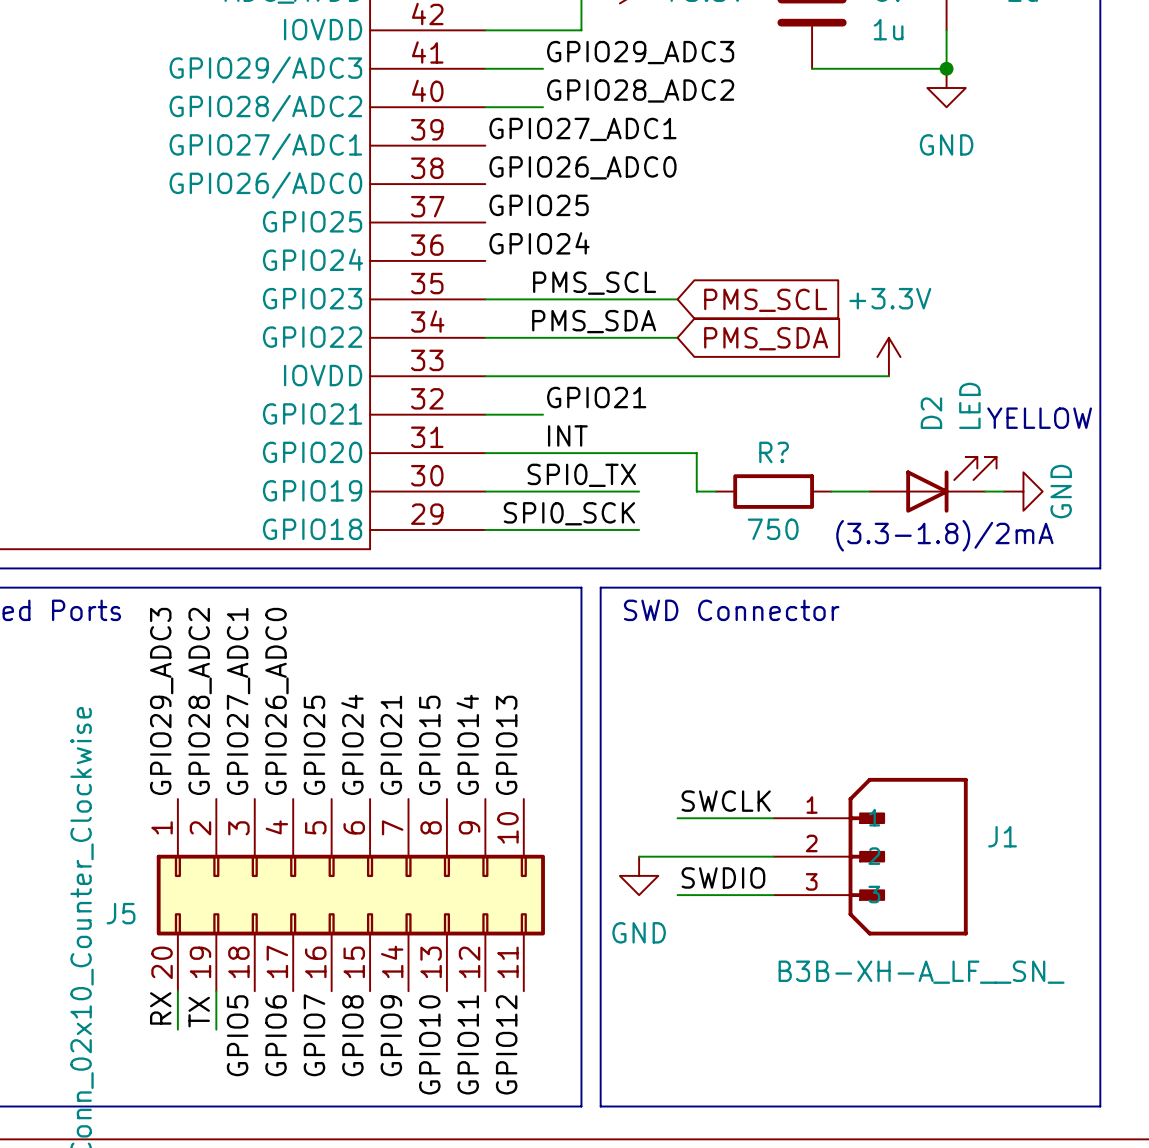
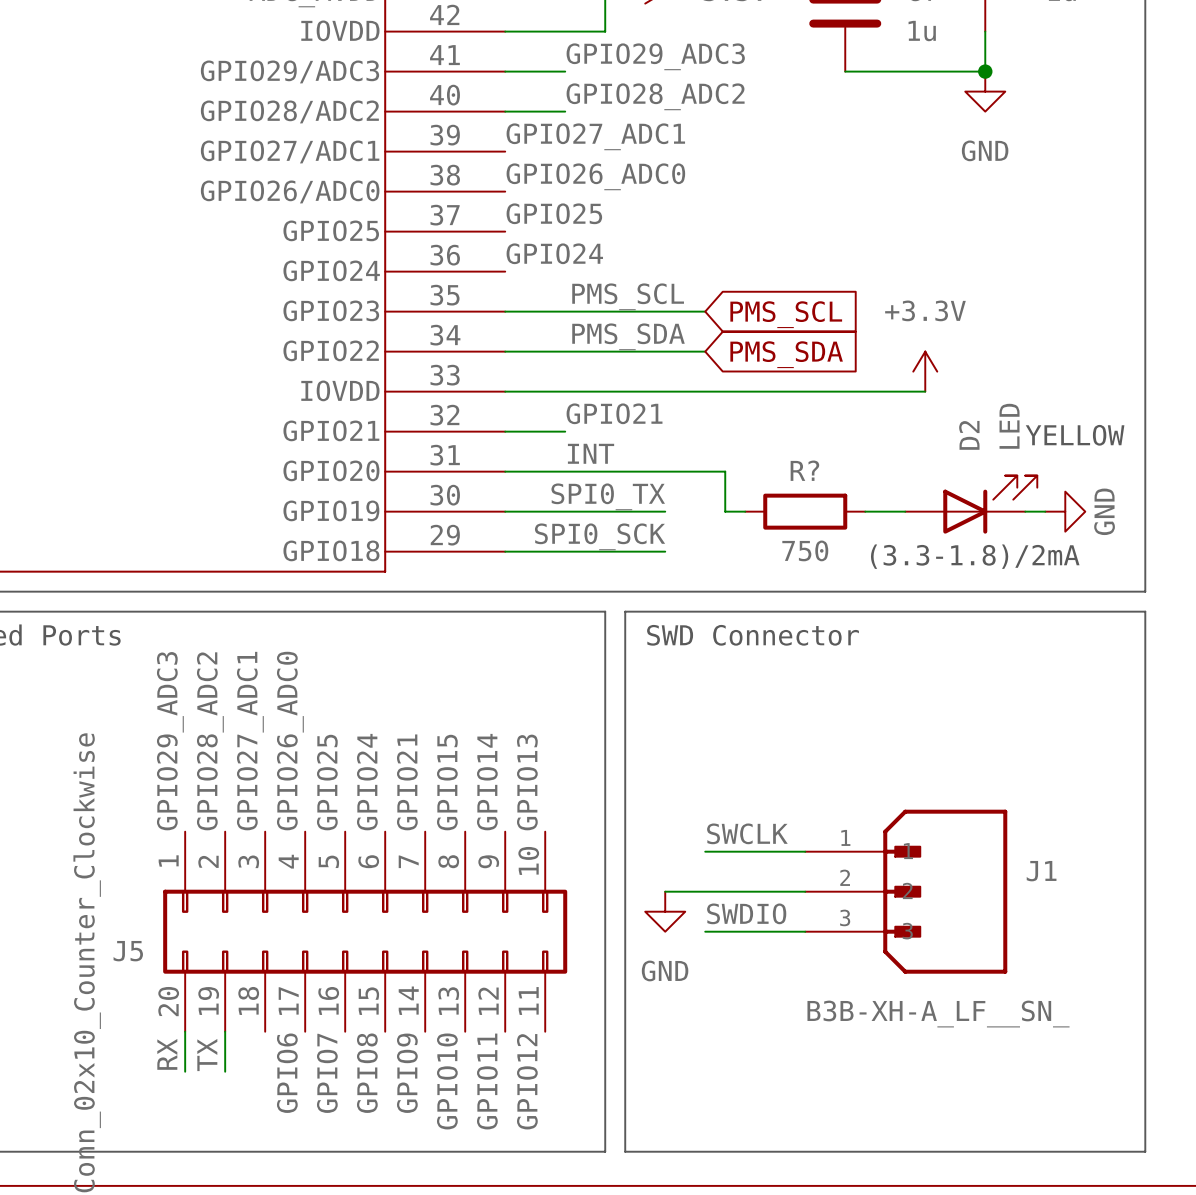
label: GPIO5 (237, 1035) -> none

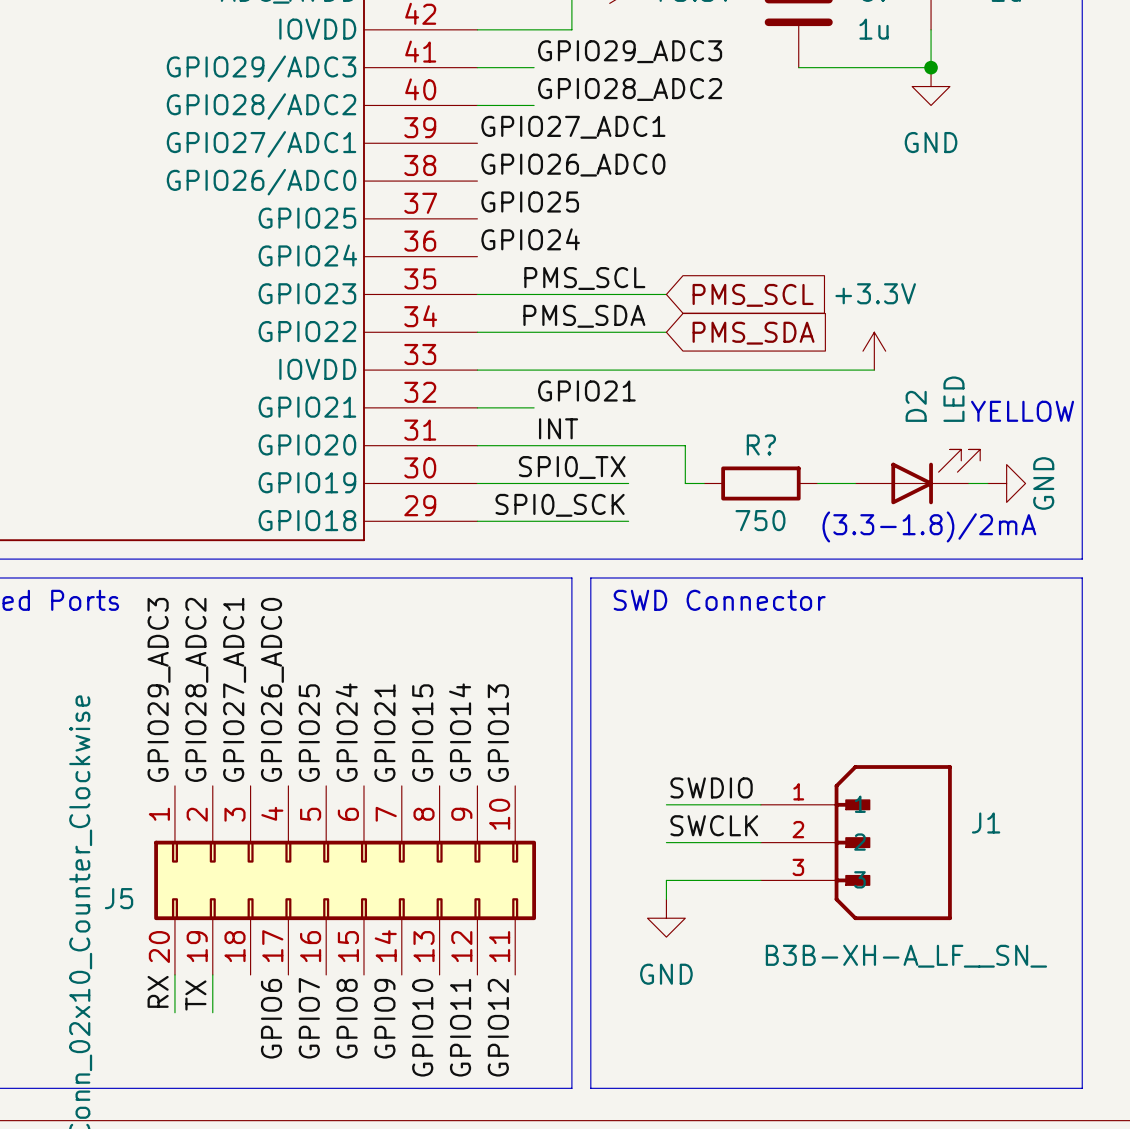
label: SWCLK (747, 833) -> SWDIO (711, 787)
label: none -> SWCLK (714, 825)
wire: (665, 891) (705, 891) -> none
power symbol position: GND (665, 911) -> GND (666, 918)
label: SWDIO (746, 913) -> none
wire: none -> (666, 880) (666, 899)

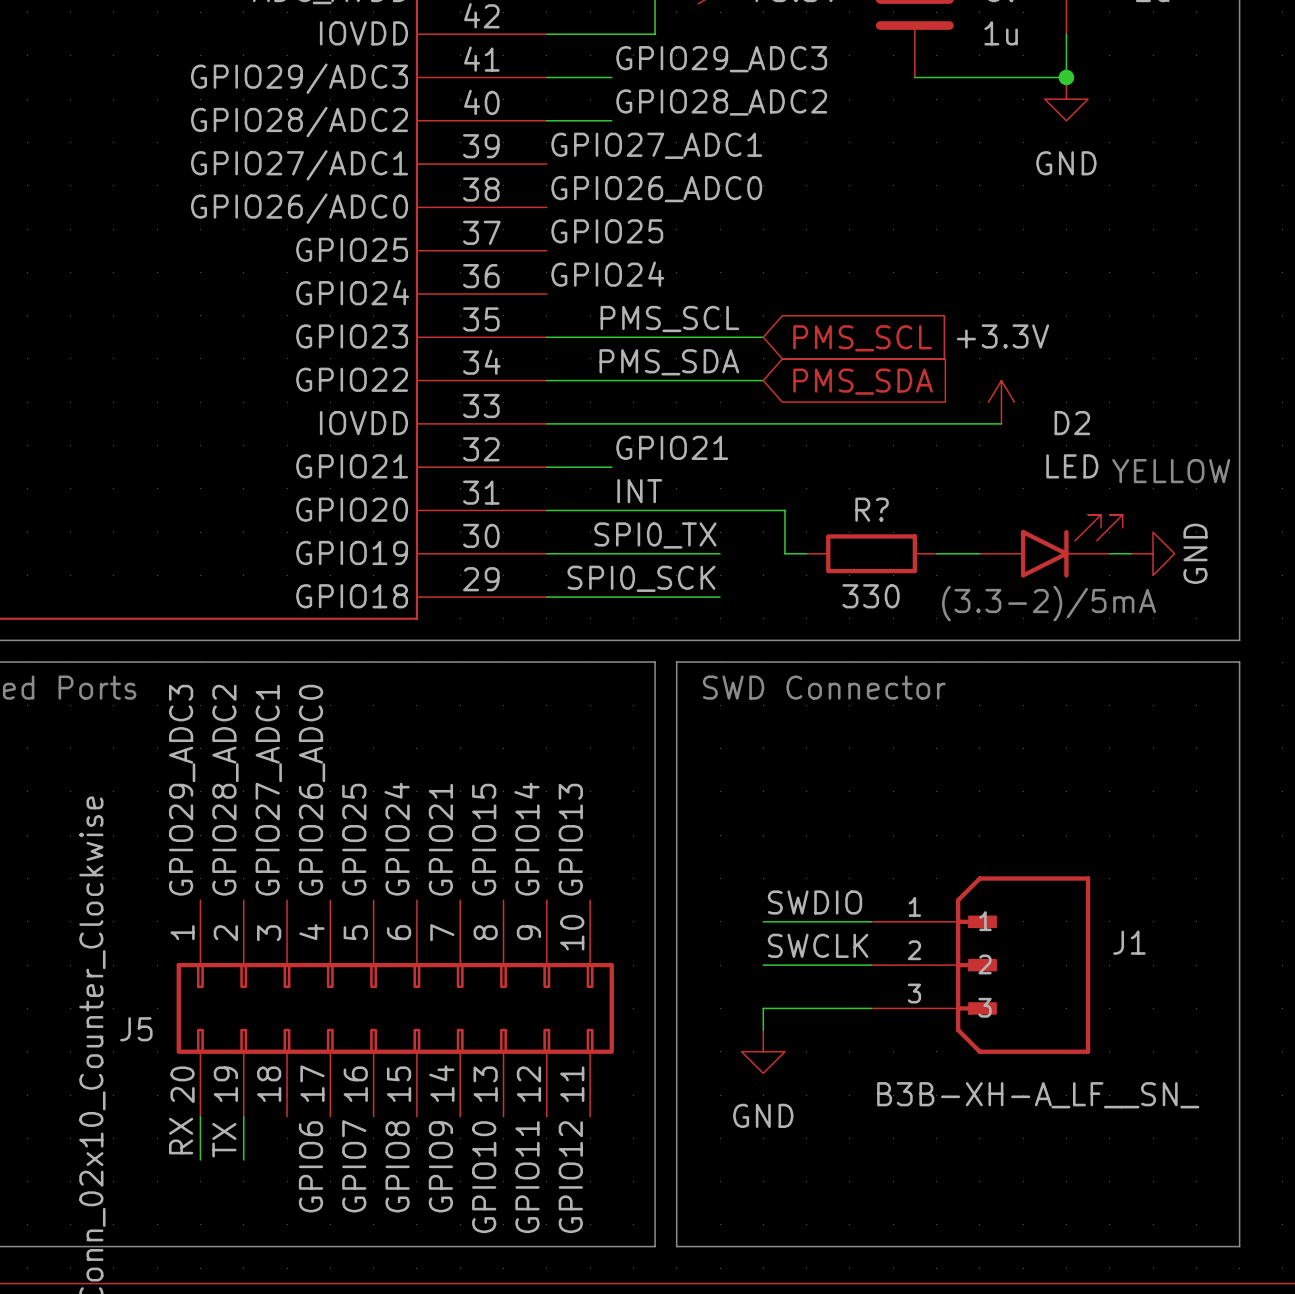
D2 name position: D2 (916, 406) -> D2 (1072, 423)
D2 symbol: [855, 449, 981, 505] -> [979, 514, 1123, 578]
R? value: 750 (760, 520) -> 330 (871, 596)
text: (3.3-1.8)/2mA (929, 526) -> (3.3-2)/5mA (1049, 603)

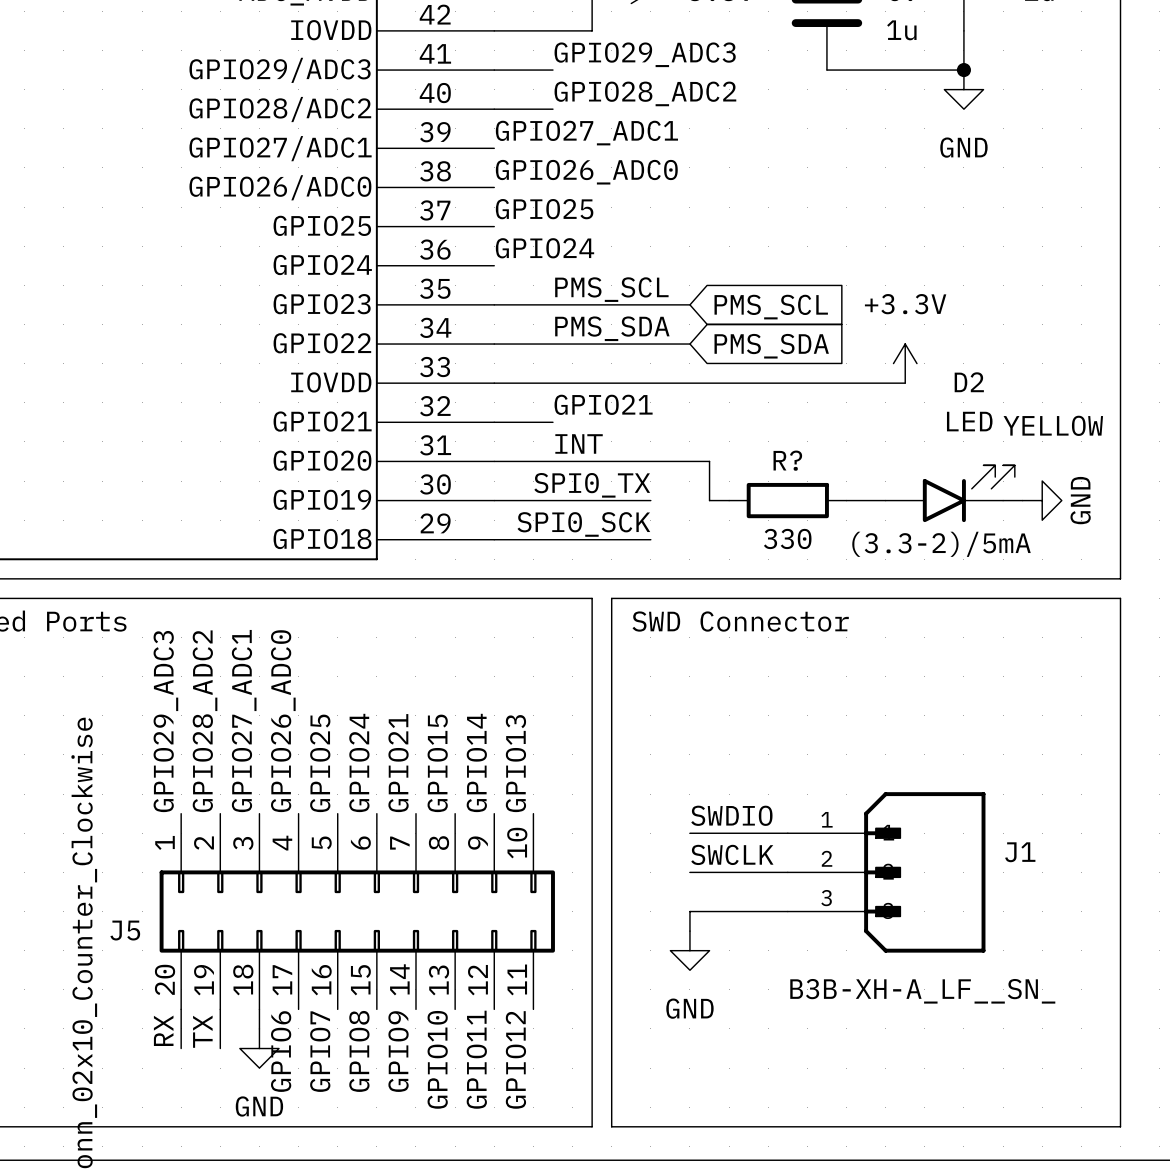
wire: none -> (259, 1009) (259, 1028)
power symbol: none -> GND (259, 1048)

